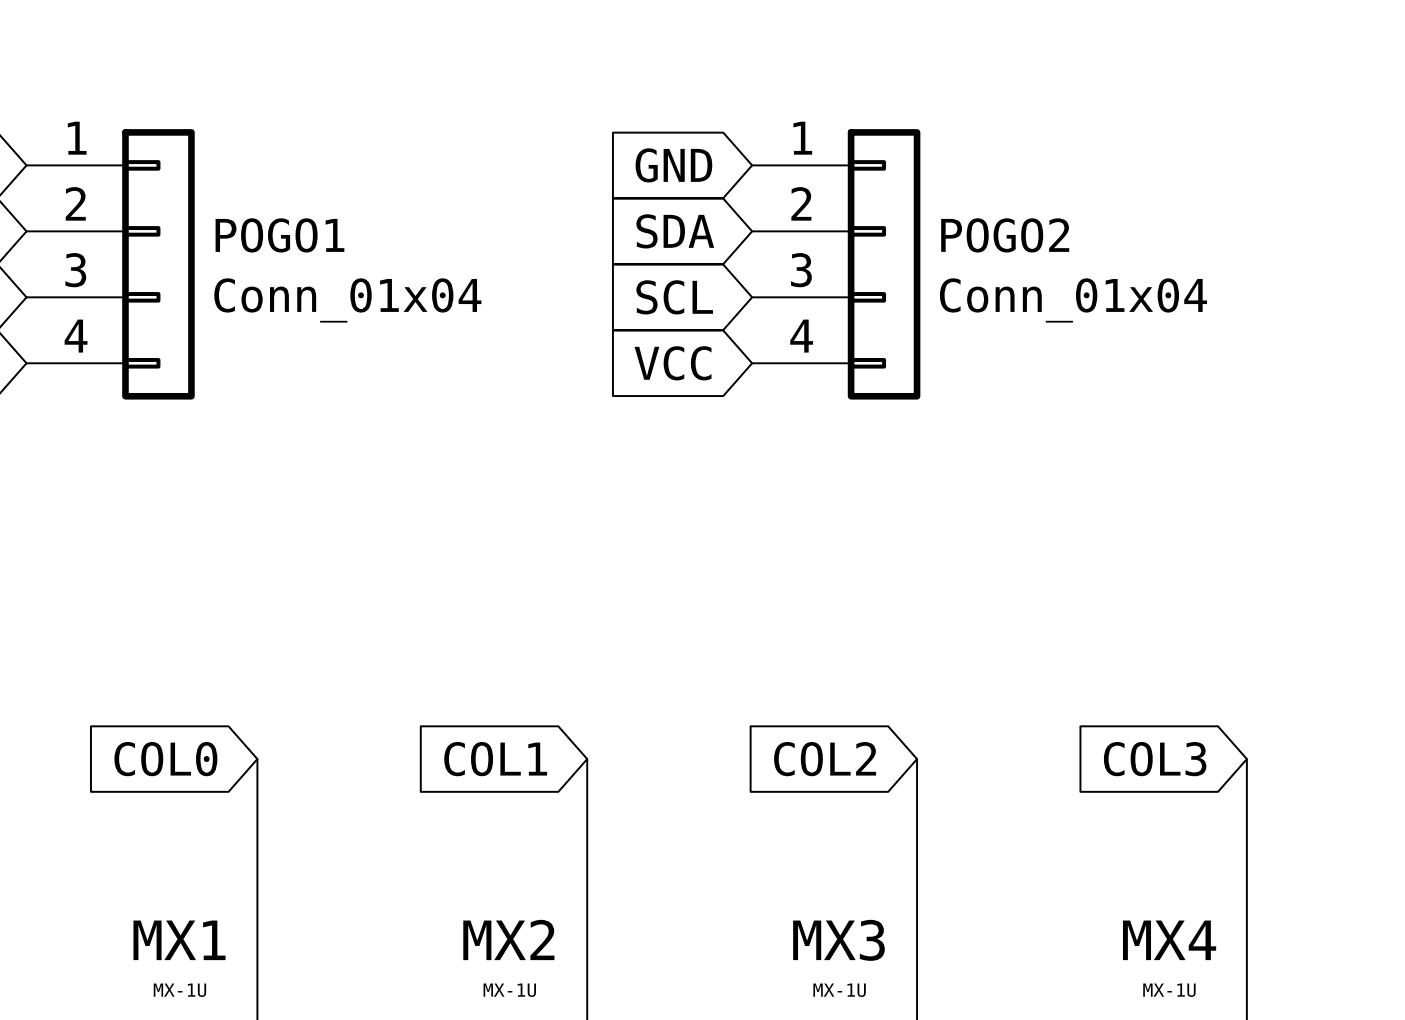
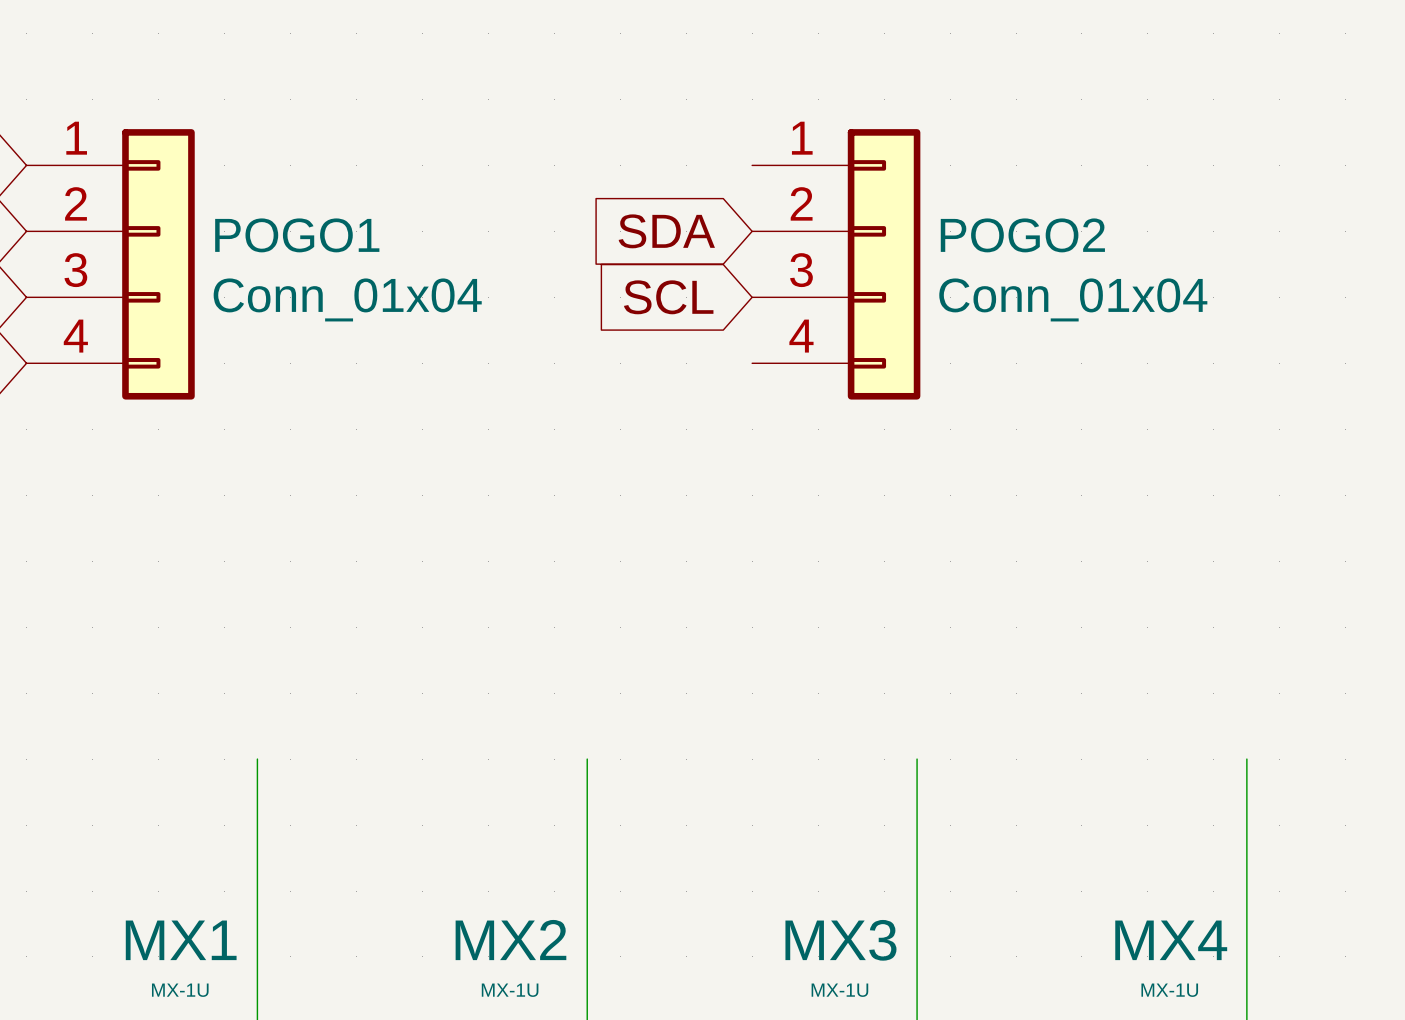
global label: GND (673, 165) -> none
global label: VCC (673, 363) -> none
global label: COL0 (165, 759) -> none
global label: COL1 (495, 759) -> none
global label: COL2 (825, 759) -> none
global label: COL3 (1155, 759) -> none

